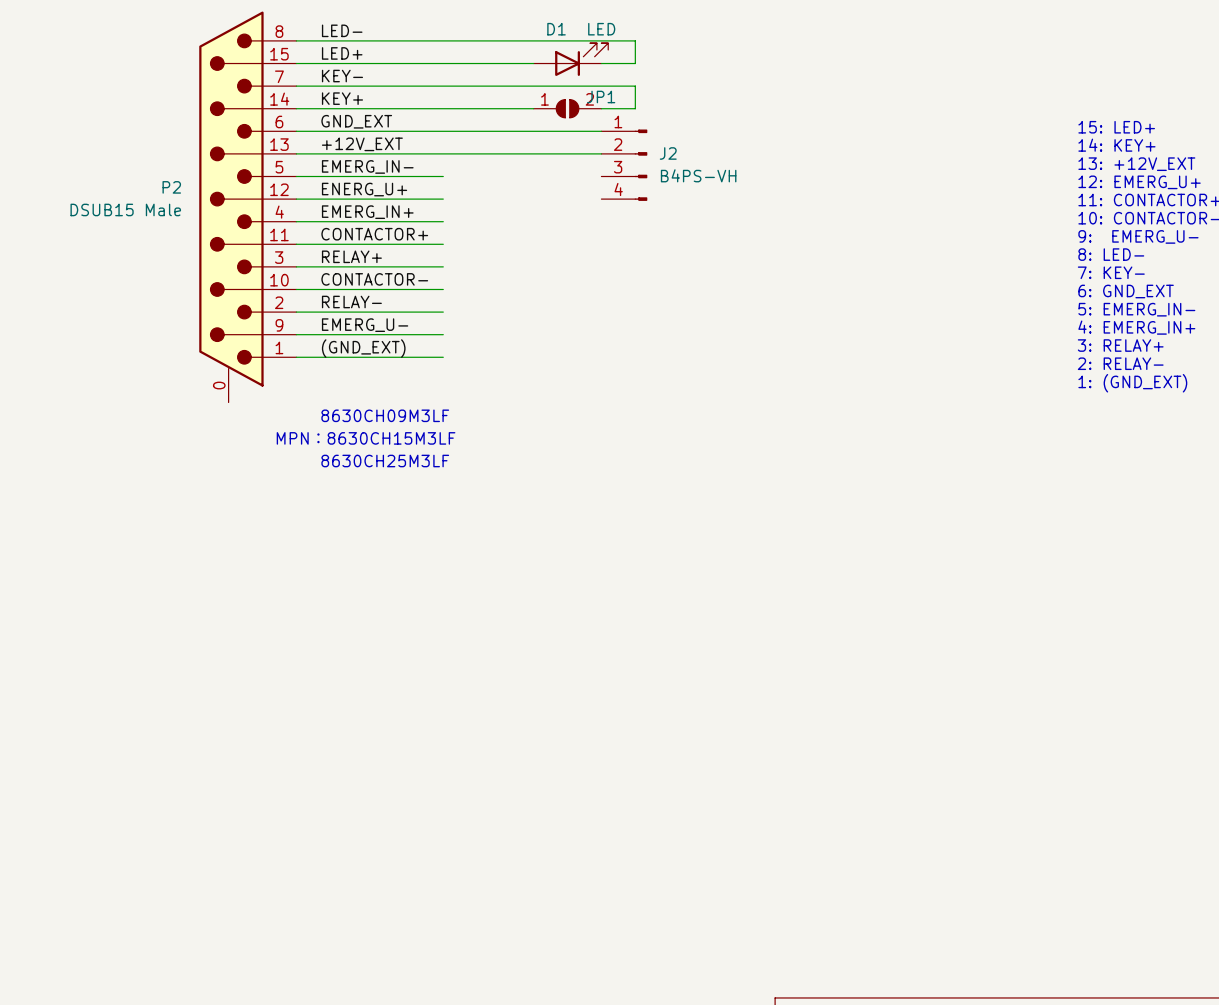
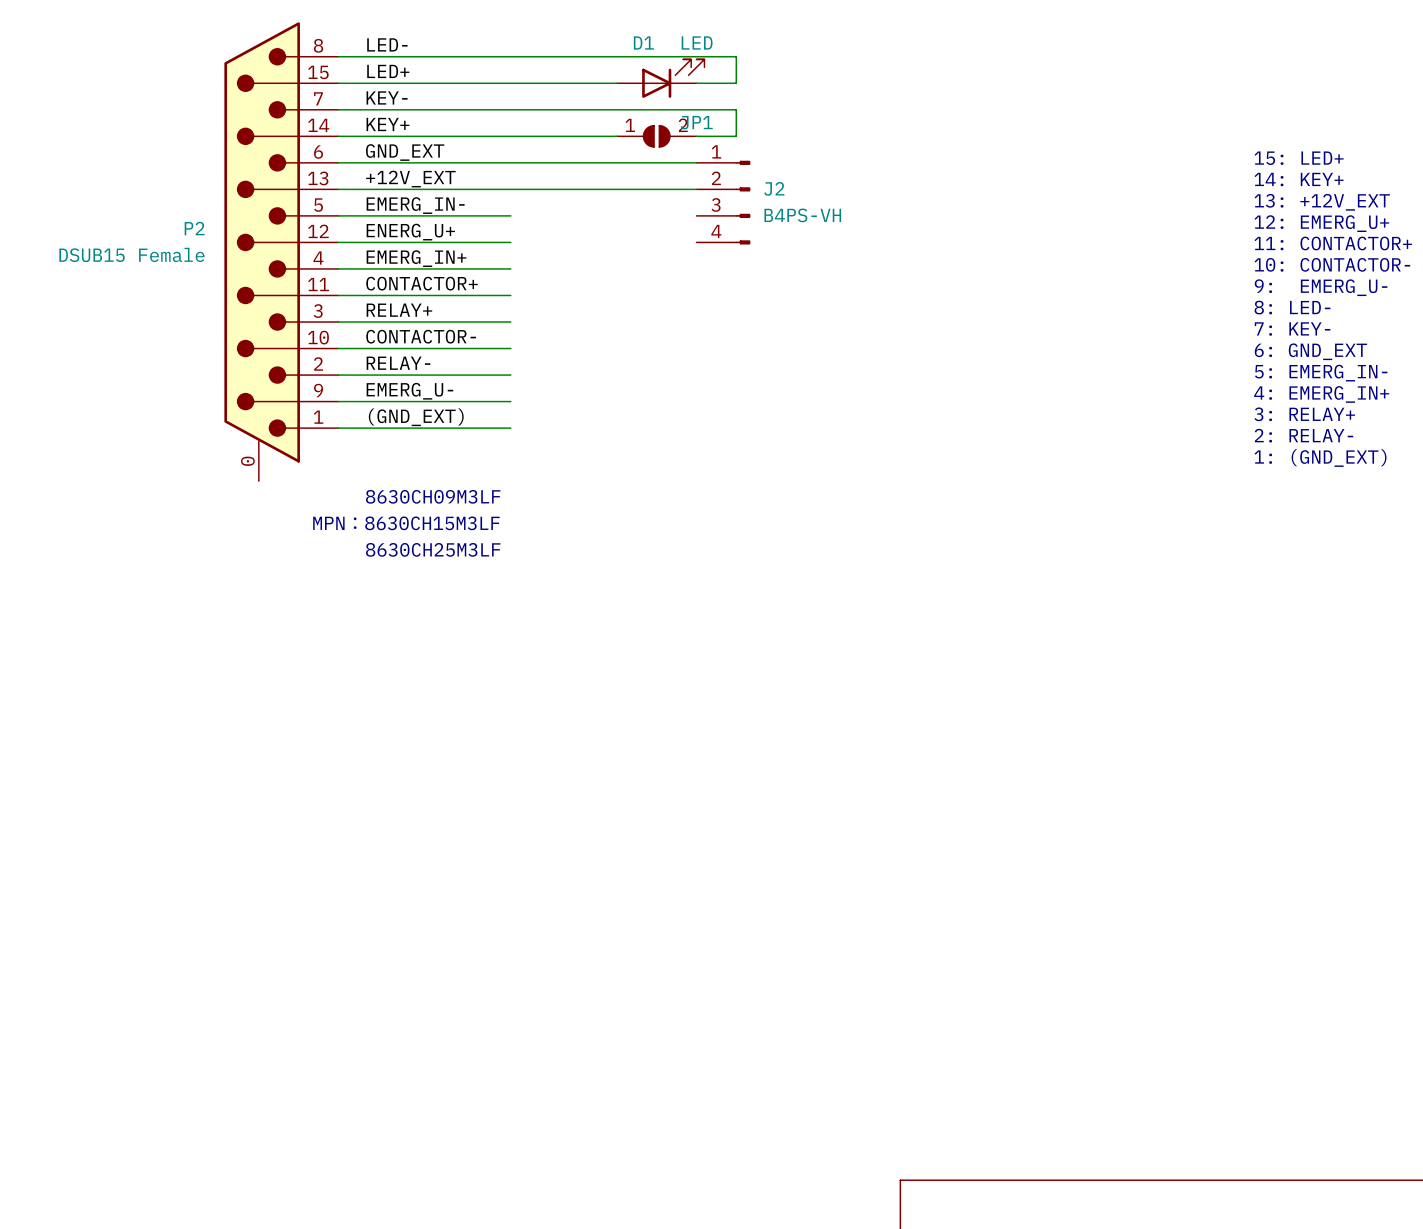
P2 value: DSUB15 Male (125, 209) -> DSUB15 Female (131, 254)

